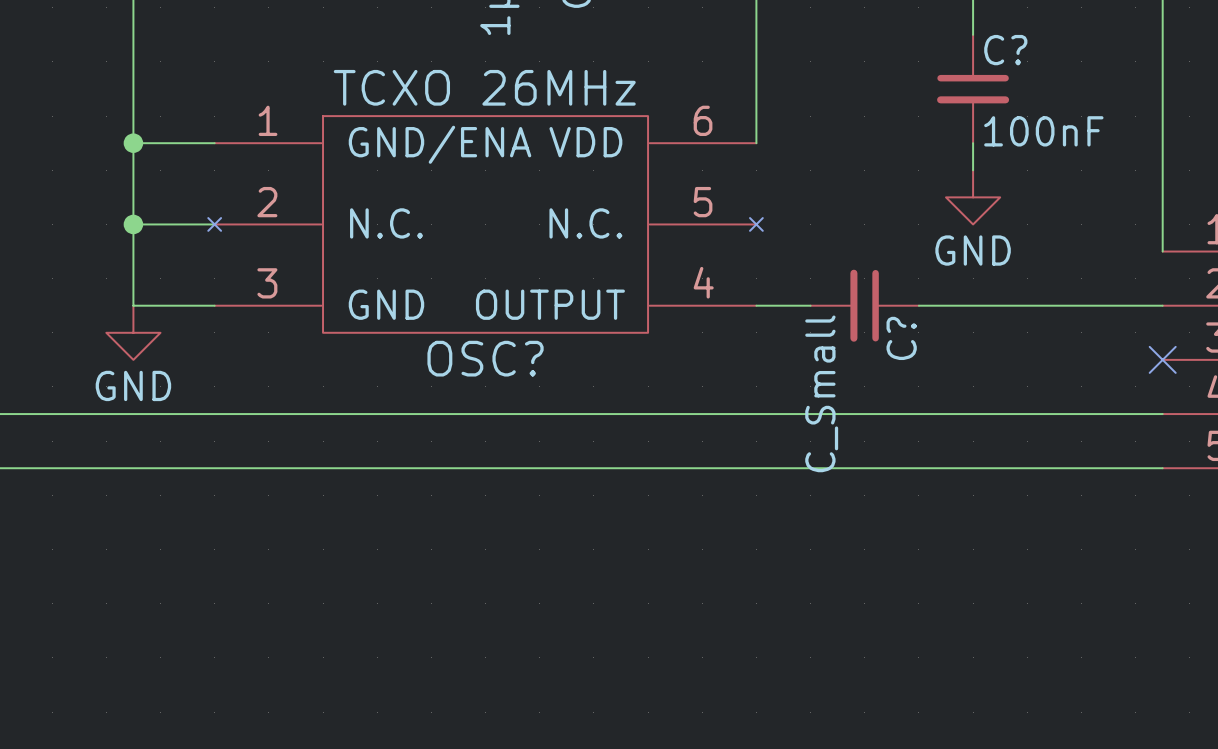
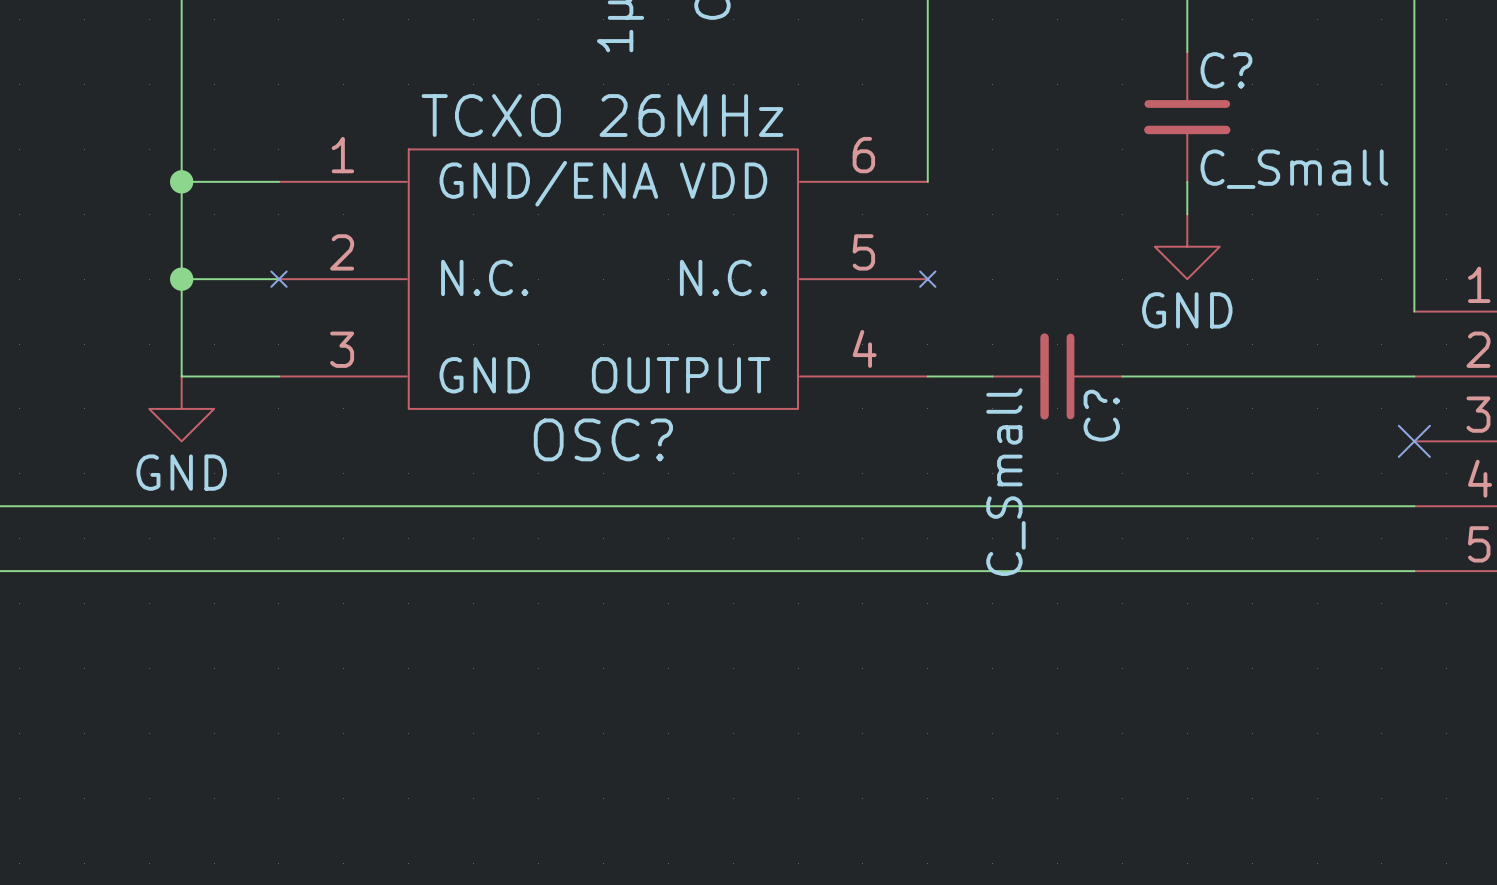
C? value: 100nF (1043, 131) -> C_Small (1294, 169)

